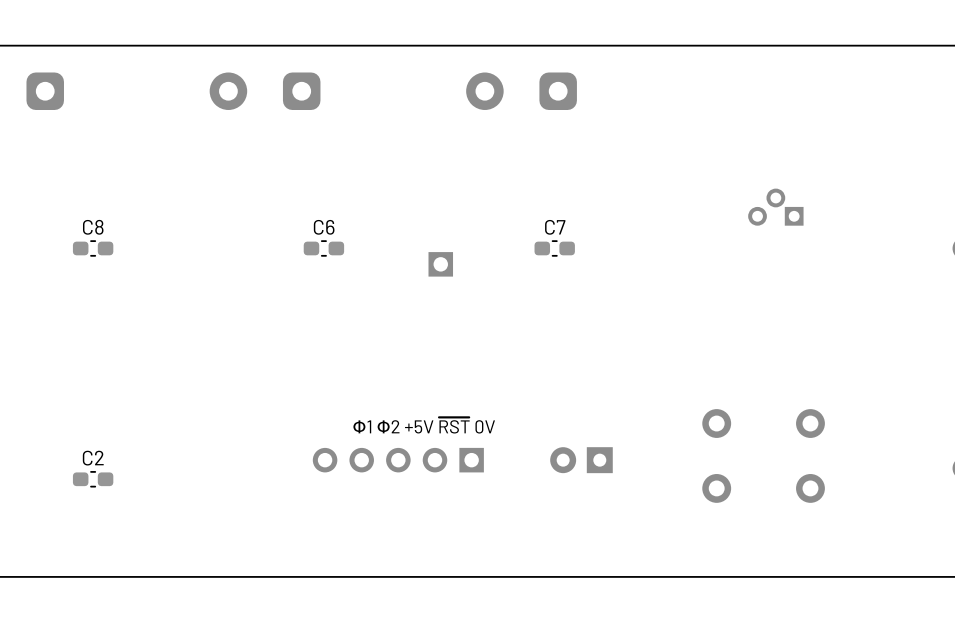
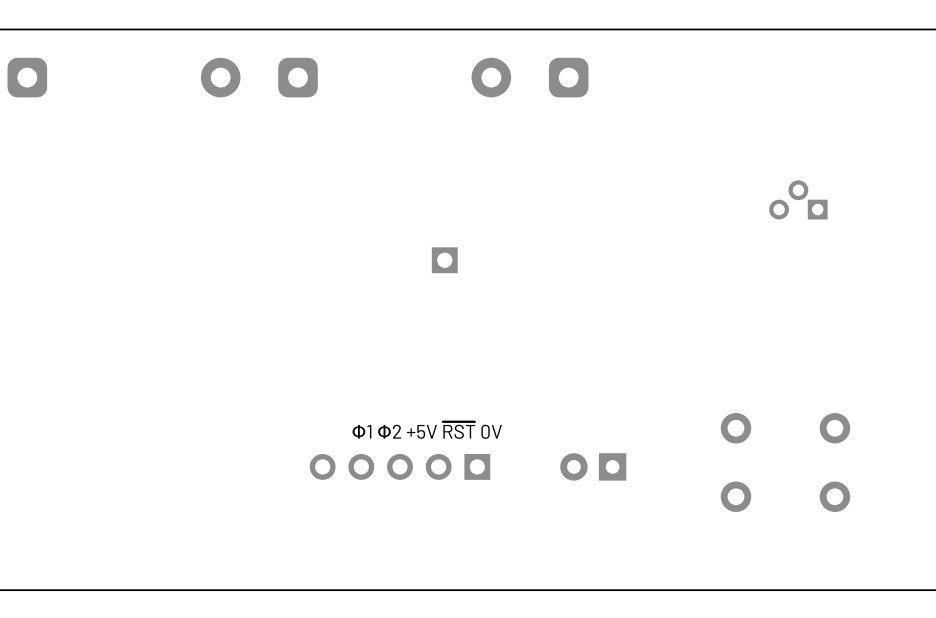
C8: (93, 248) -> none
C6: (323, 248) -> none
C7: (554, 248) -> none
C2: (93, 479) -> none

